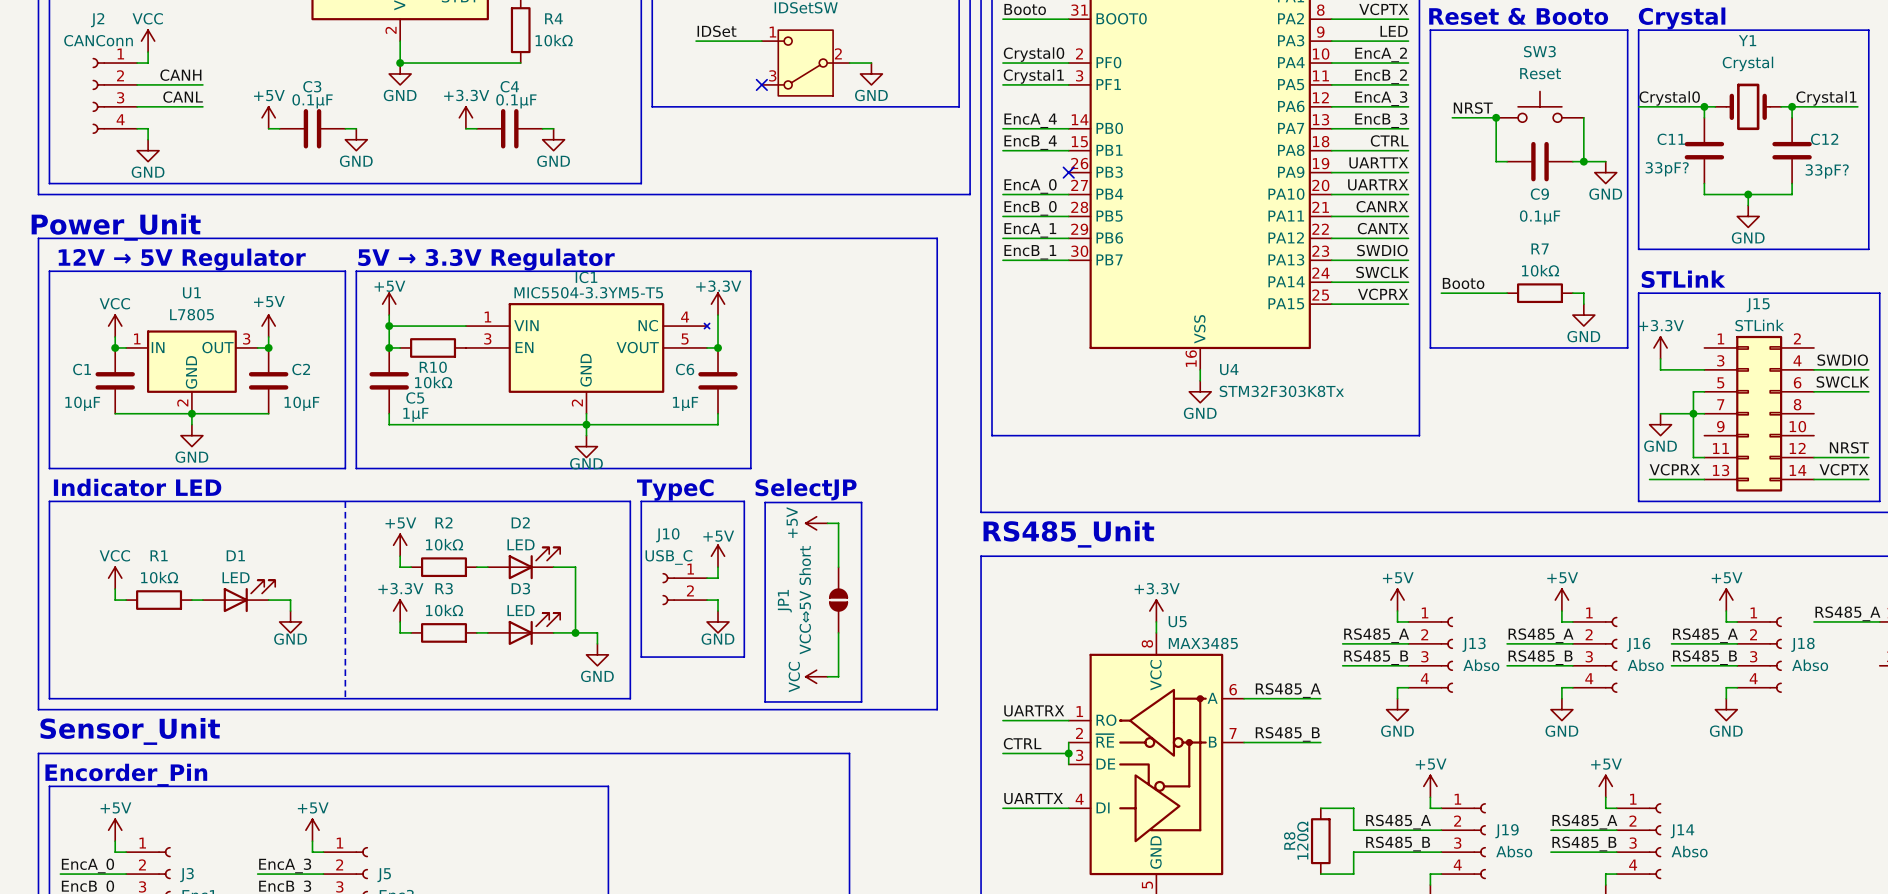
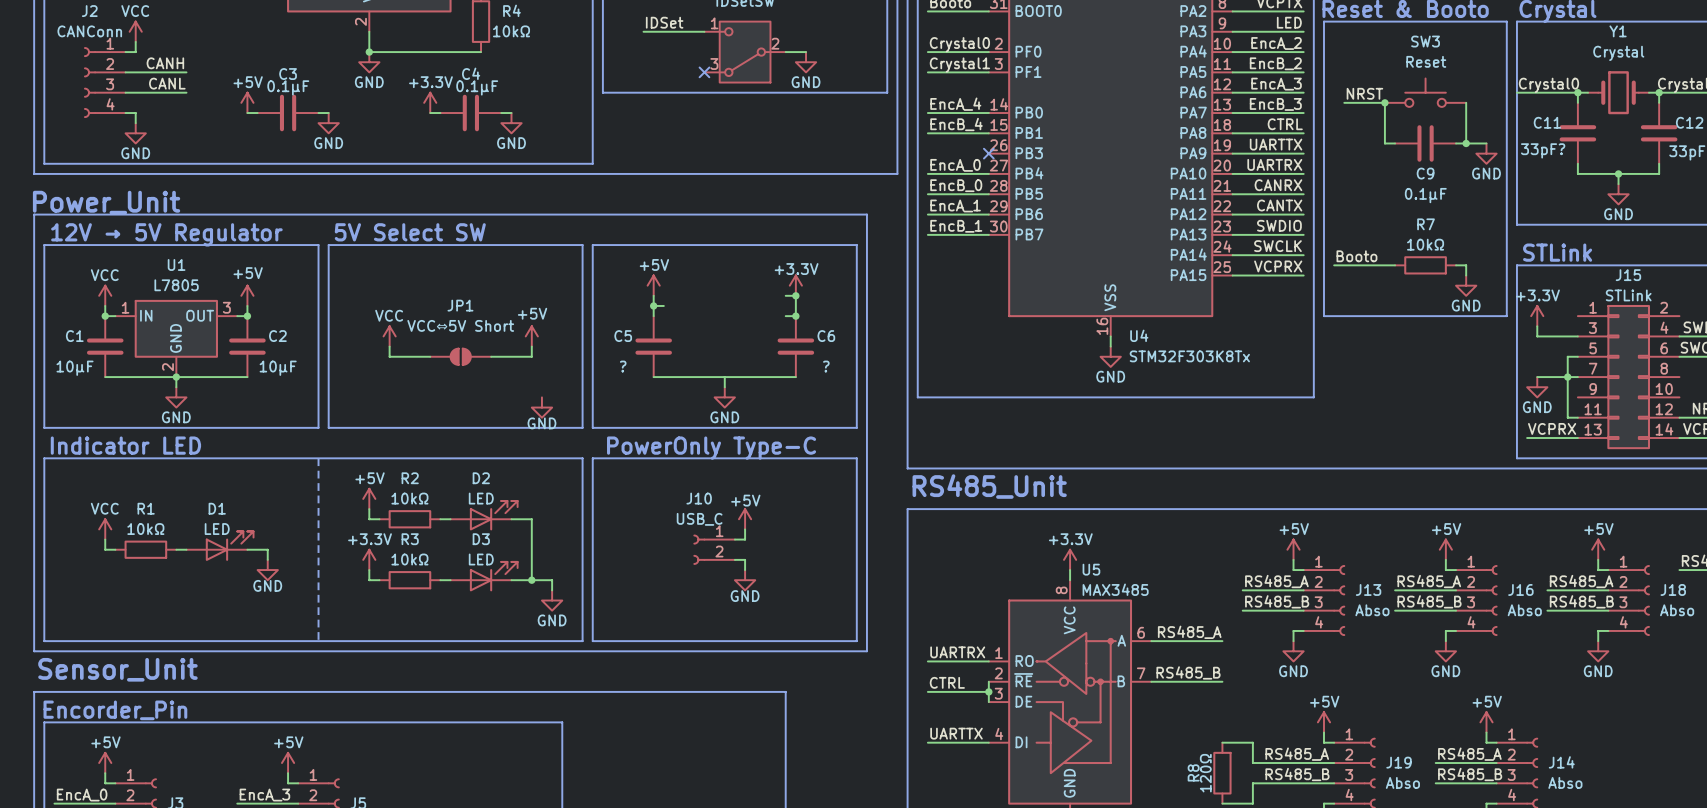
text: none -> 5V Select SW (410, 232)
text: 5V → 3.3V Regulator (486, 259) -> none
line: (630, 271) (641, 271) -> (582, 245) (582, 427)
line: (750, 271) (750, 468) -> (694, 245) (856, 245) (856, 427) (694, 427)
power symbol: +5V (389, 304) -> none
power symbol position: +3.3V (718, 304) -> +3.3V (795, 285)
wire: (389, 315) (389, 347) (400, 347) -> none
power symbol: none -> +5V (653, 285)
wire: (718, 315) (718, 347) (707, 347) -> (653, 295) (653, 316)
wire: (389, 326) (465, 326) -> none
junction: (389, 326) -> none
wire: none -> (785, 295) (795, 295) (795, 316) (785, 316)
junction: none -> (795, 295)
wire: none -> (653, 305) (663, 305)
junction: (389, 347) -> none
R10: 10kΩ (433, 347) -> none
junction position: (718, 347) -> (653, 305)
junction: none -> (795, 316)
IC1: MIC5504-3.3YM5-T5 (587, 358) -> none
power symbol: none -> VCC (389, 336)
power symbol: none -> +5V (531, 336)
C6 name position: C6 (685, 369) -> C6 (826, 336)
C5 position: (389, 380) -> (653, 346)
wire: none -> (389, 346) (389, 356) (430, 356)
C6 position: (718, 380) -> (795, 346)
C5 name position: C5 (415, 397) -> C5 (623, 336)
C6 value: 1μF (685, 403) -> ? (826, 366)
wire: (389, 413) (389, 424) (718, 424) (718, 413) -> none
wire: (586, 413) (586, 435) -> none
wire: none -> (653, 377) (795, 377)
wire: none -> (724, 377) (724, 387)
C5 value: 1μF (415, 414) -> ? (623, 366)
junction: (586, 424) -> none
power symbol: none -> GND (724, 397)
line: (630, 468) (641, 468) -> (592, 245) (592, 427)
text: TypeC (675, 489) -> none
text: none -> PowerOnly Type-C (711, 448)
text: SelectJP (806, 489) -> none
line: (744, 501) (744, 657) (641, 657) -> (688, 458) (856, 458) (856, 641) (592, 641) (592, 602)
line: (765, 502) (861, 502) (861, 701) (765, 701) (765, 502) -> none
power symbol: +5V (816, 523) -> none
wire: (827, 523) (838, 523) (838, 567) -> none
power symbol: +5V (718, 556) -> none
wire: (718, 567) (718, 578) (707, 578) -> (745, 529) (745, 539) (734, 539)
power symbol: none -> +5V (745, 519)
J10 position: (684, 589) -> (714, 549)
wire: (707, 600) (718, 600) (718, 611) -> (734, 559) (745, 559) (745, 570)
JP1 rotation: 0° (838, 600) -> 90° clockwise (460, 356)
JP1 position: (838, 600) -> (460, 356)
power symbol position: GND (718, 621) -> GND (745, 580)
wire: (838, 632) (838, 676) (827, 676) -> none
power symbol: VCC (816, 676) -> none

